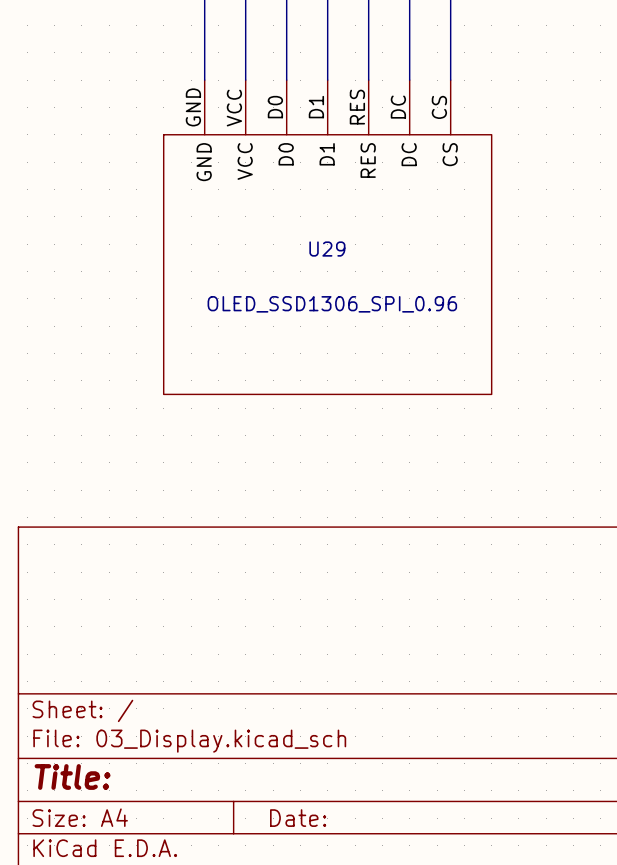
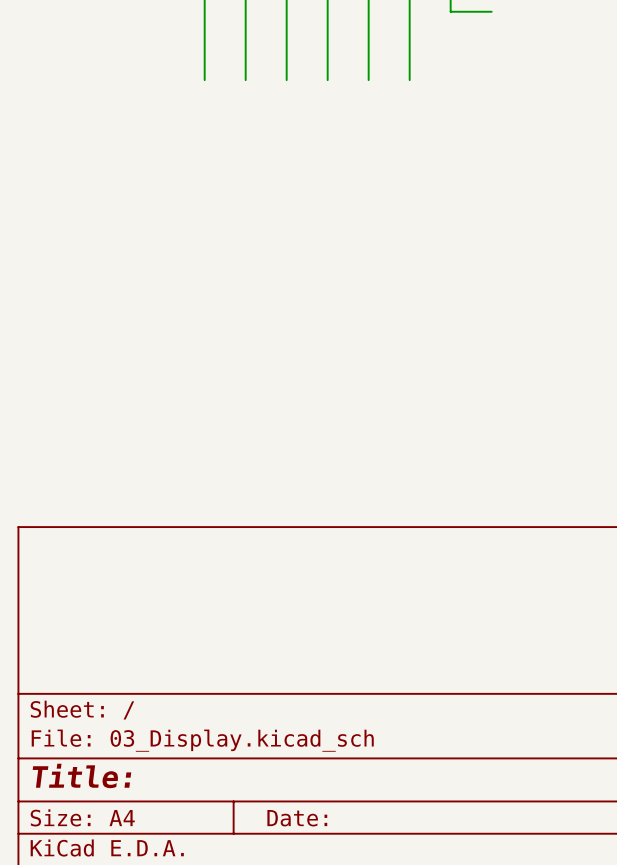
wire: (450, 11) (450, 80) -> (450, 11) (491, 11)
U29: OLED_SSD1306_SPI_0.96 (327, 237) -> none

